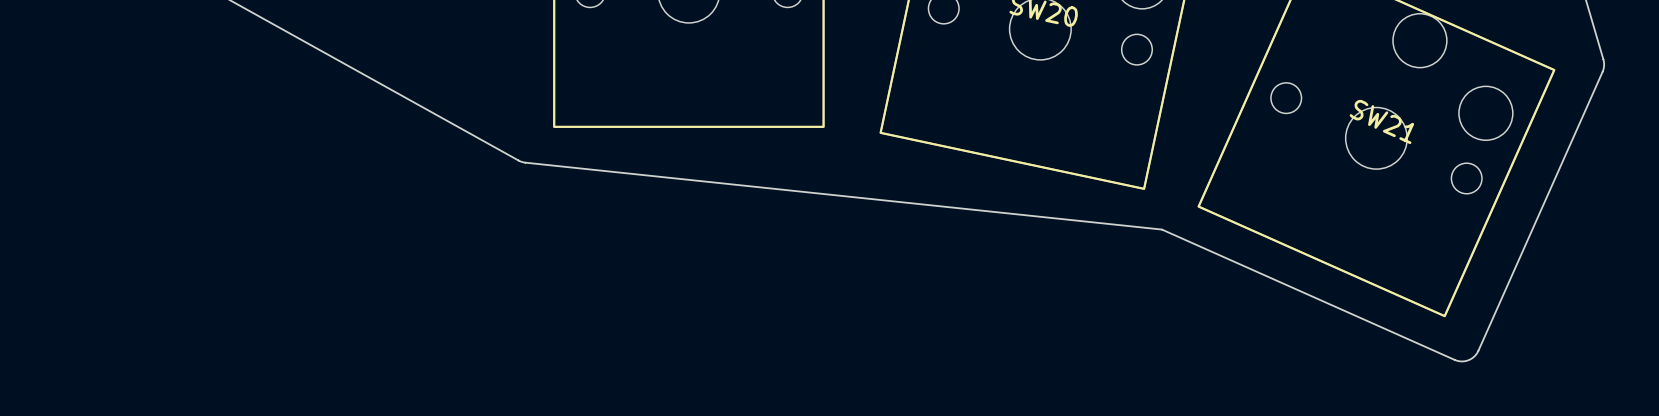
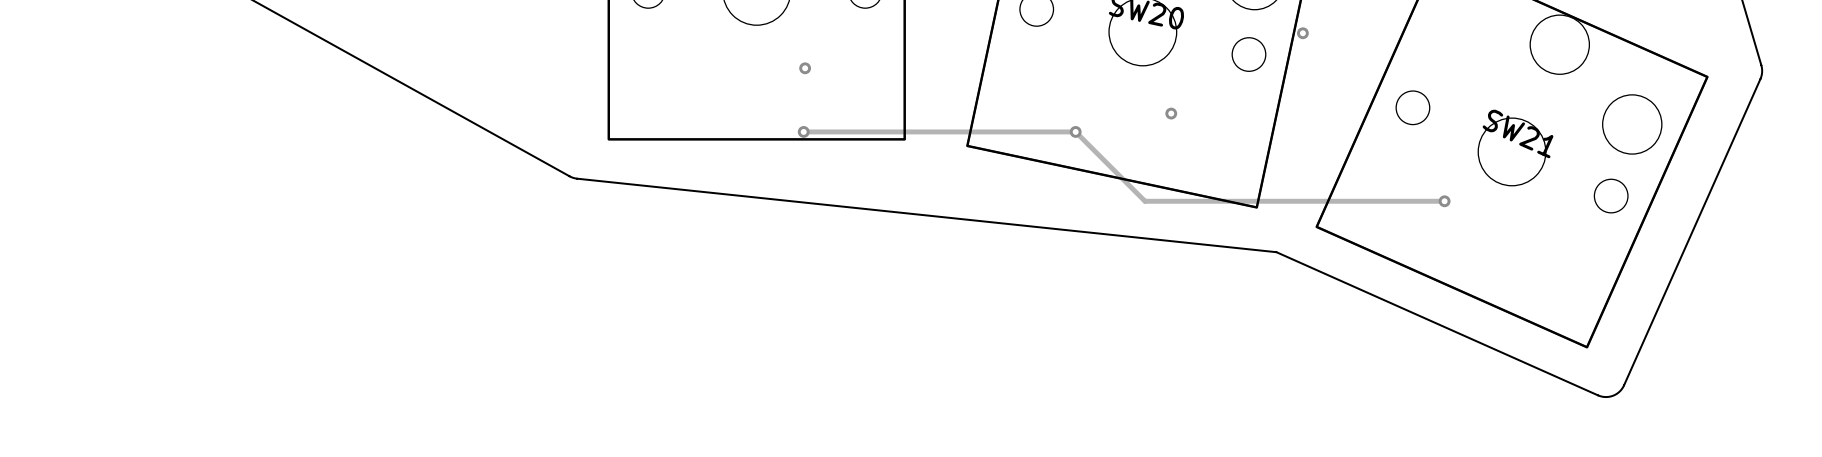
via: none -> (1302, 33)
via: none -> (805, 68)
via: none -> (1171, 113)
track: none -> (803, 131) (1075, 131) (1145, 201) (1444, 201)
via: none -> (803, 131)
via: none -> (1075, 131)
via: none -> (1444, 201)

